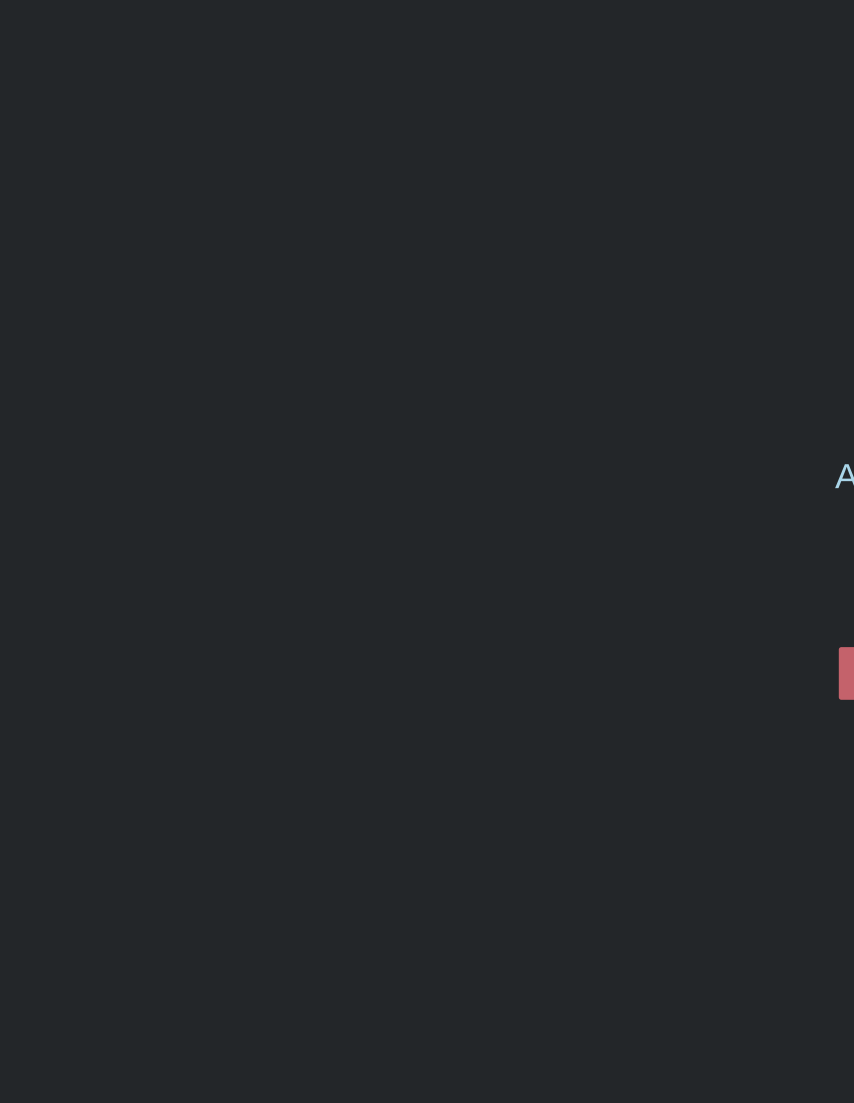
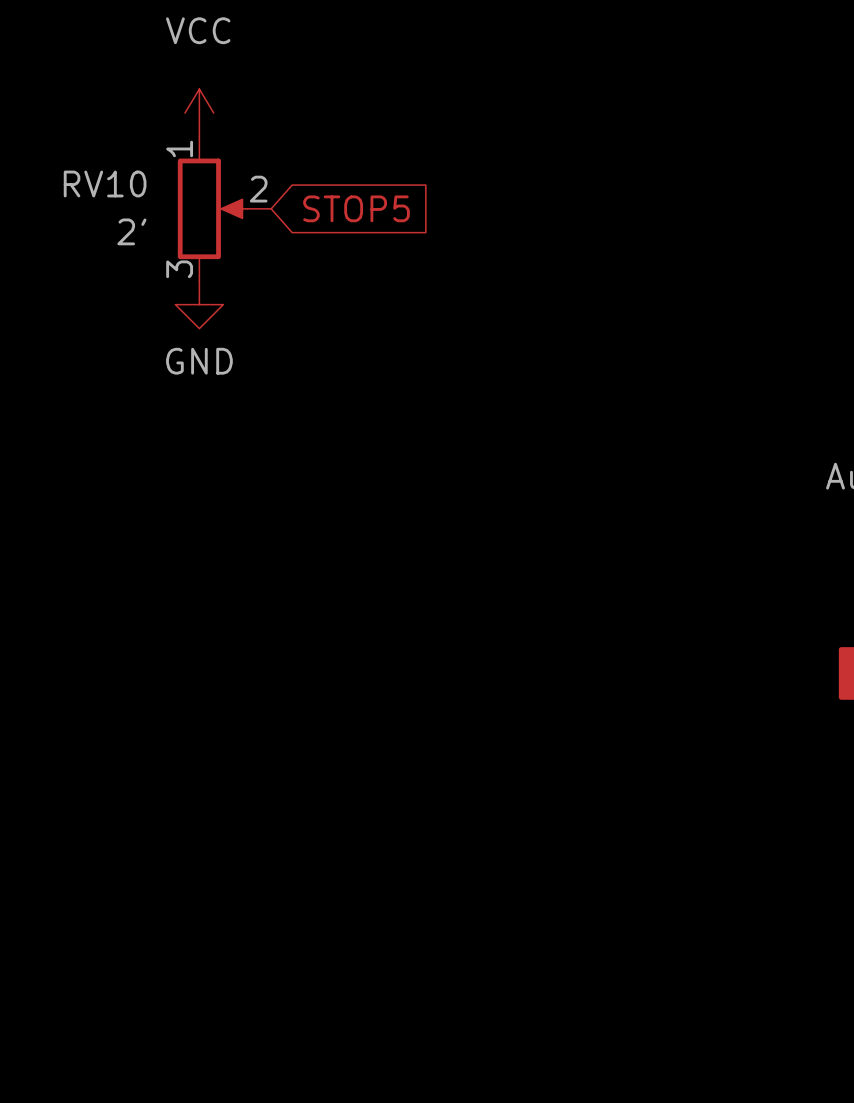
power symbol: none -> VCC (199, 113)
RV10: none -> 2' (224, 208)
global label: none -> STOP5 (356, 208)
power symbol: none -> GND (199, 304)

